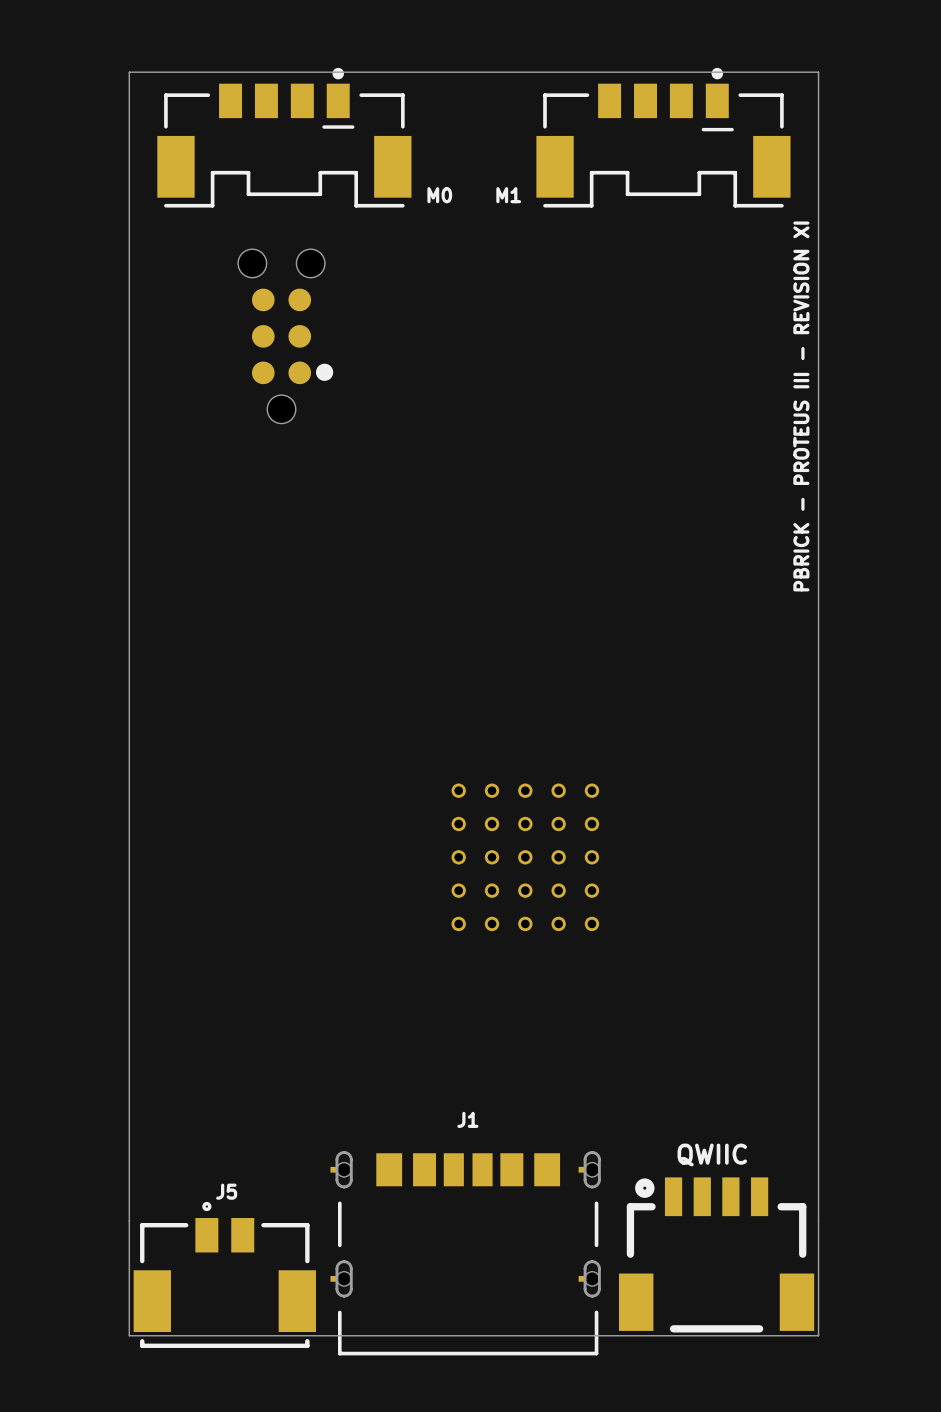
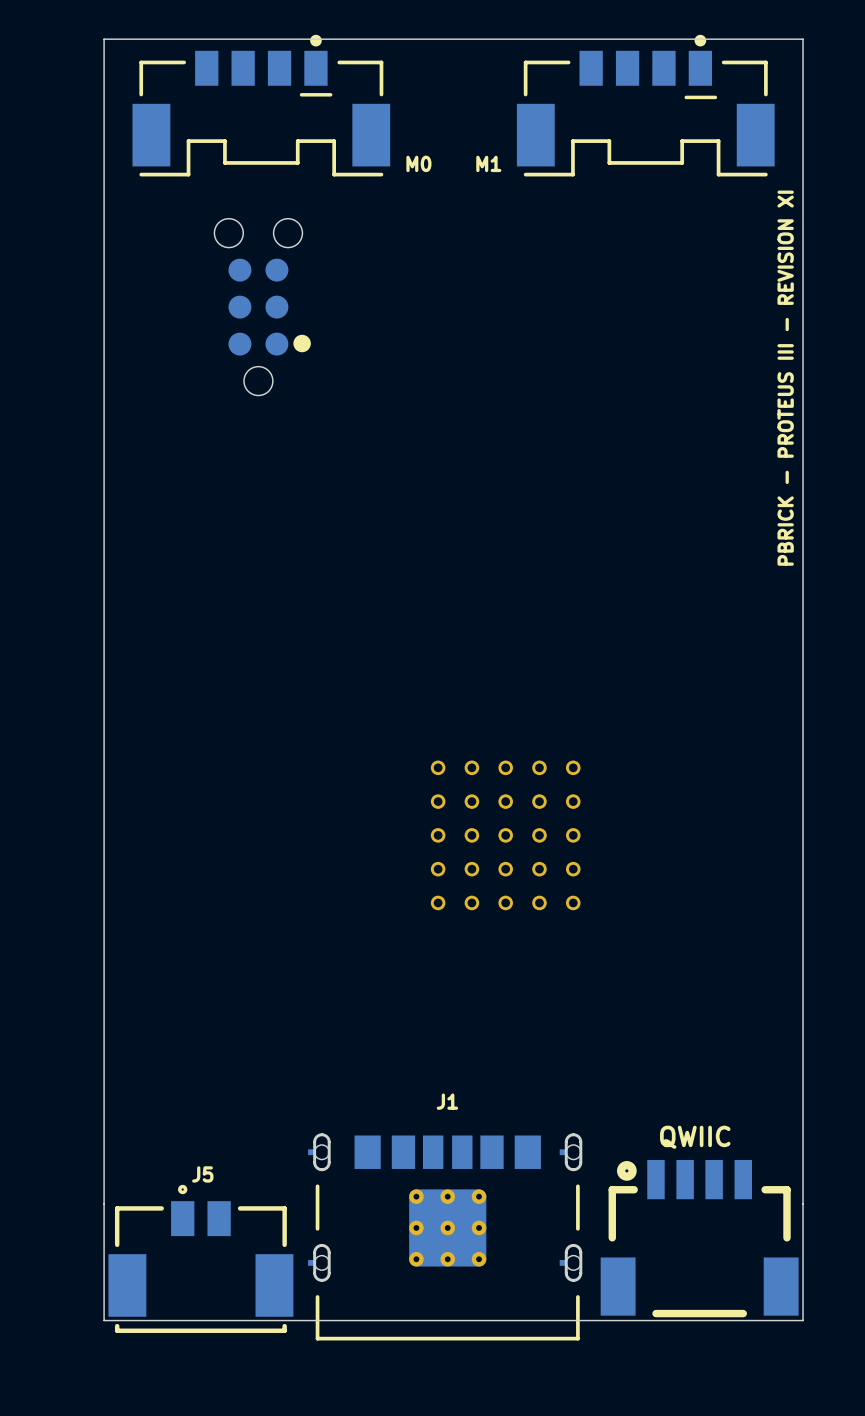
part: none -> (447, 1227)

